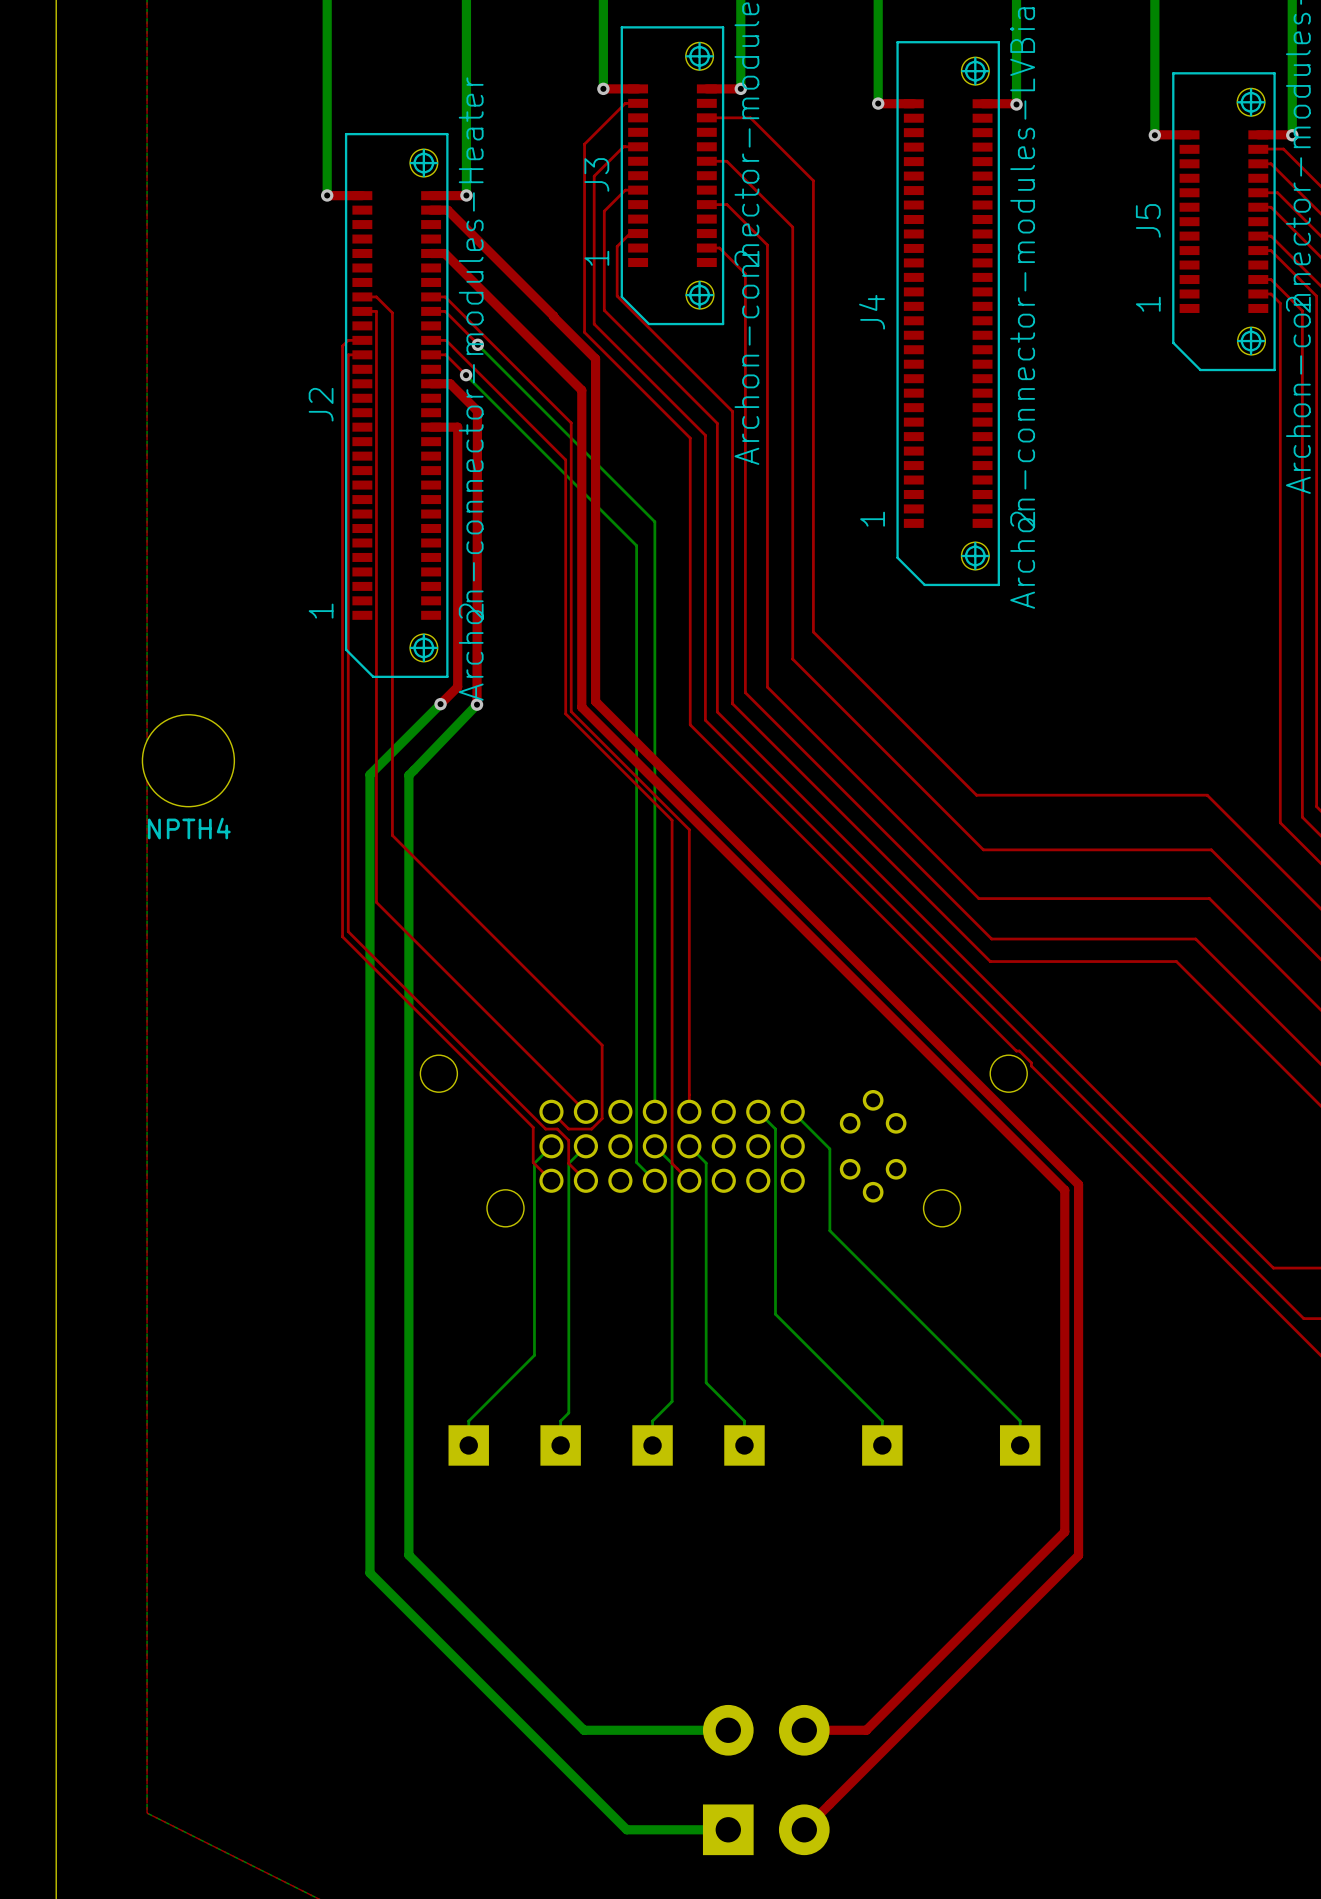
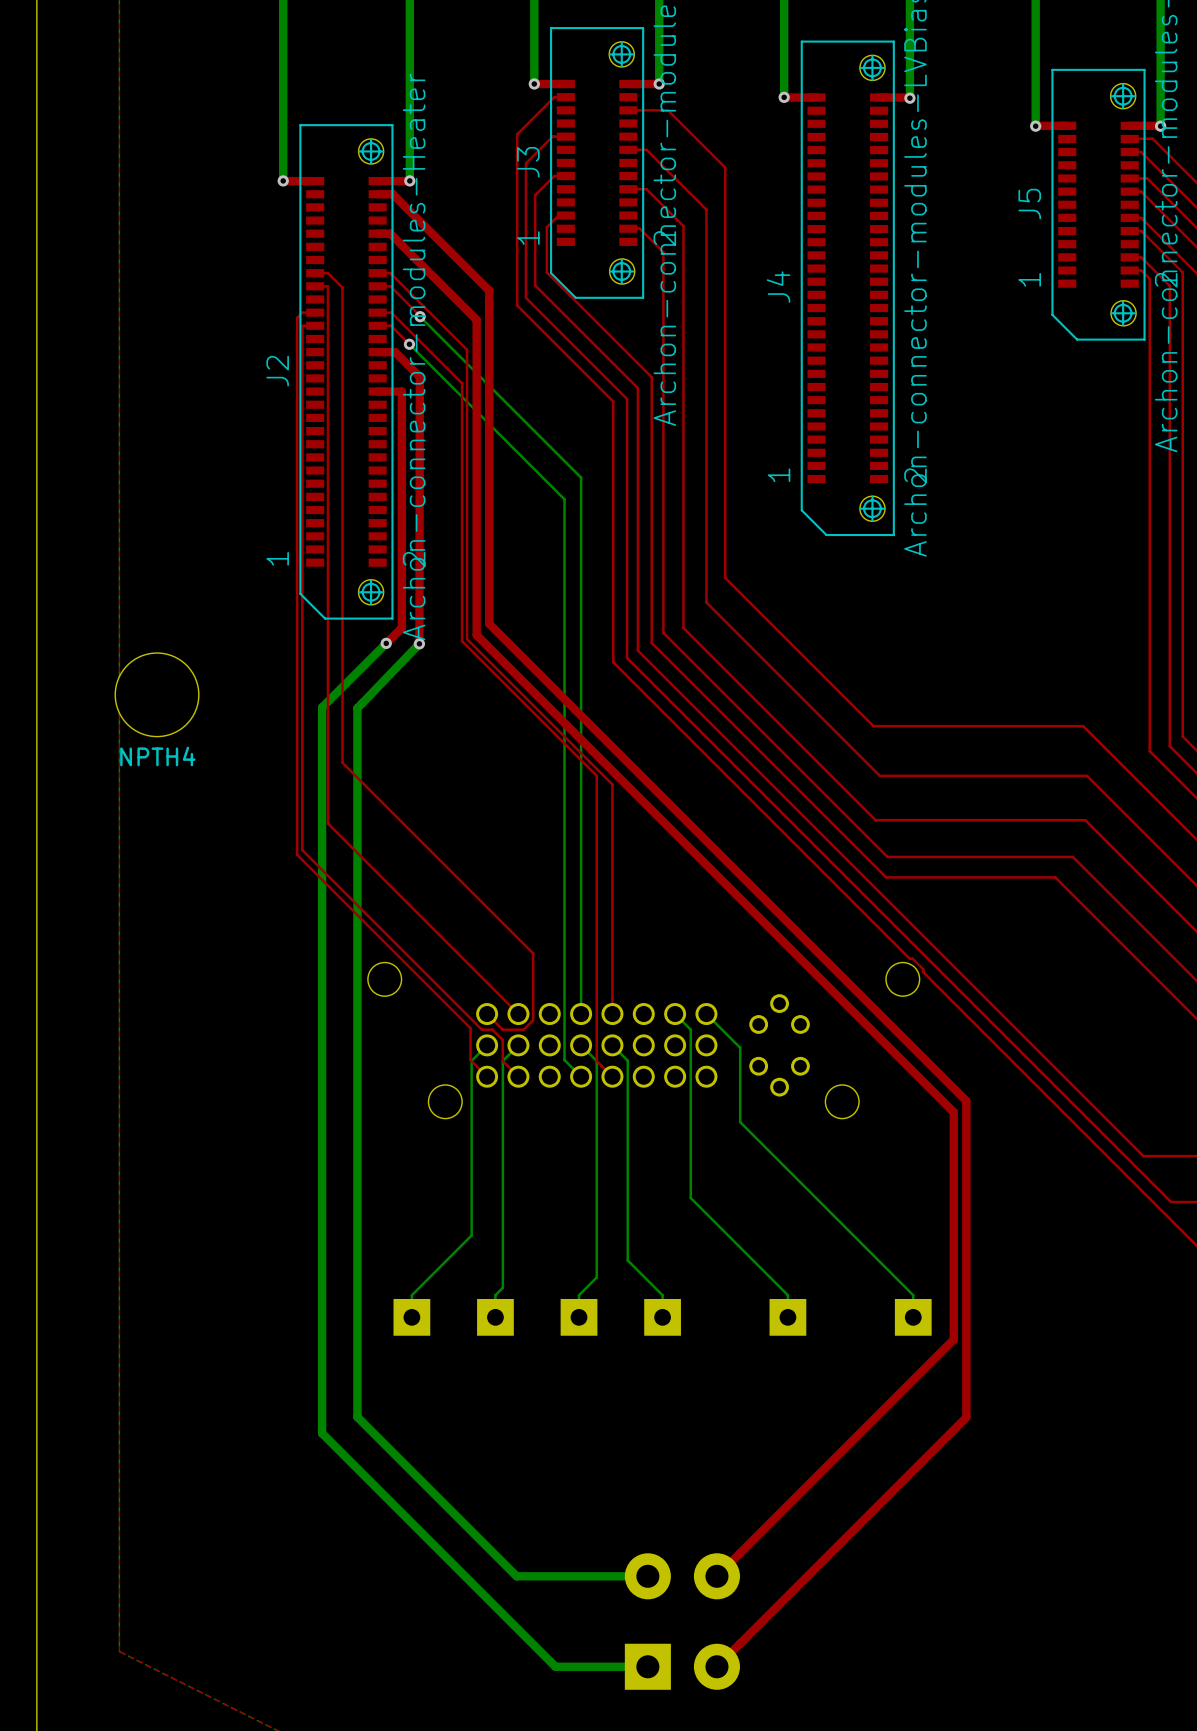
top track: (553, 317) (595, 358) (595, 701) (1078, 1184) (1078, 1207) -> (489, 291) (489, 623) (966, 1100)
top track: (539, 348) (581, 390) (581, 707) (1064, 1190) (1064, 1219) -> (476, 320) (476, 635) (953, 1112)
top track: (529, 381) (571, 422) (571, 711) (689, 829) (689, 859) -> (467, 349) (467, 639) (612, 784)
top track: (523, 418) (565, 459) (565, 713) (672, 820) (672, 849) -> (462, 383) (462, 641) (596, 775)
top track: (1064, 1469) (1064, 1531) (866, 1730) (804, 1730) -> (953, 1339) (716, 1576)

